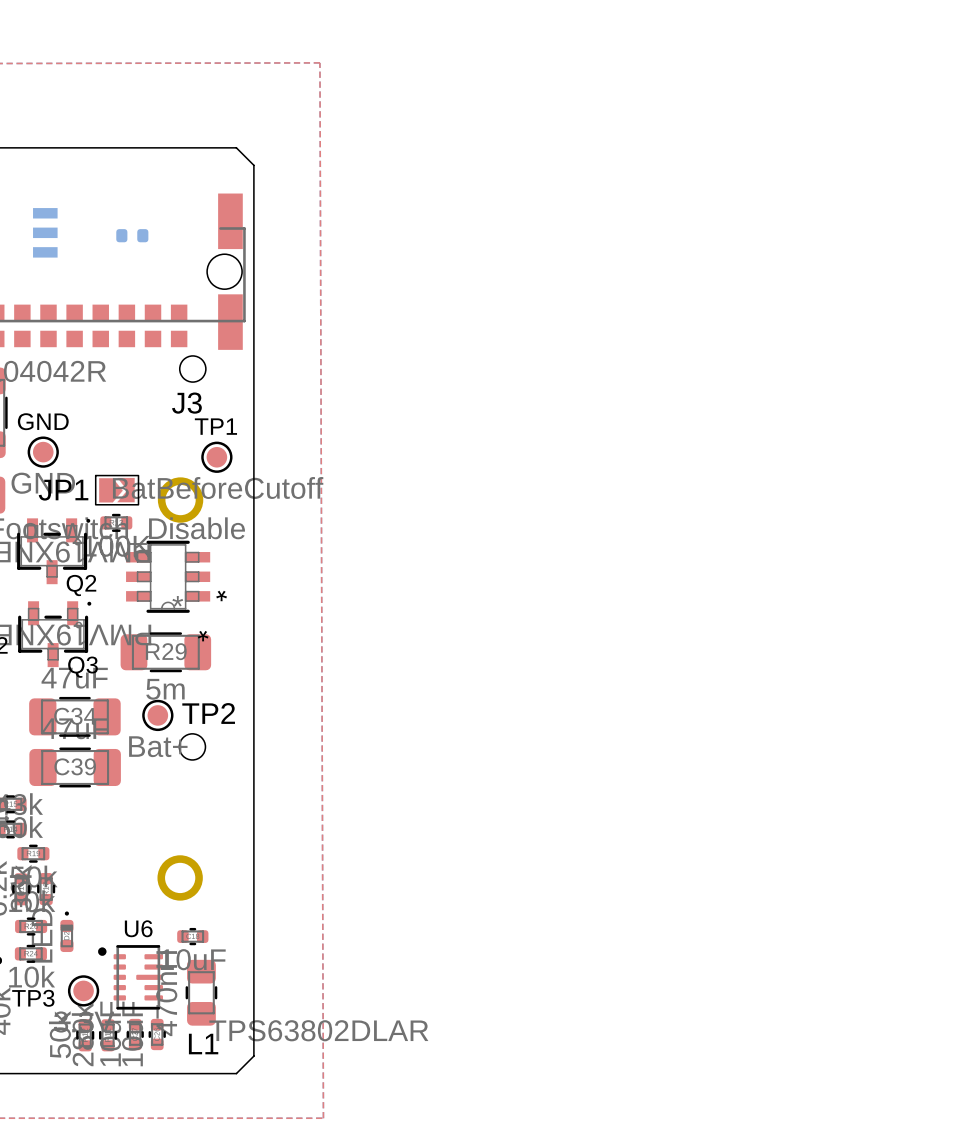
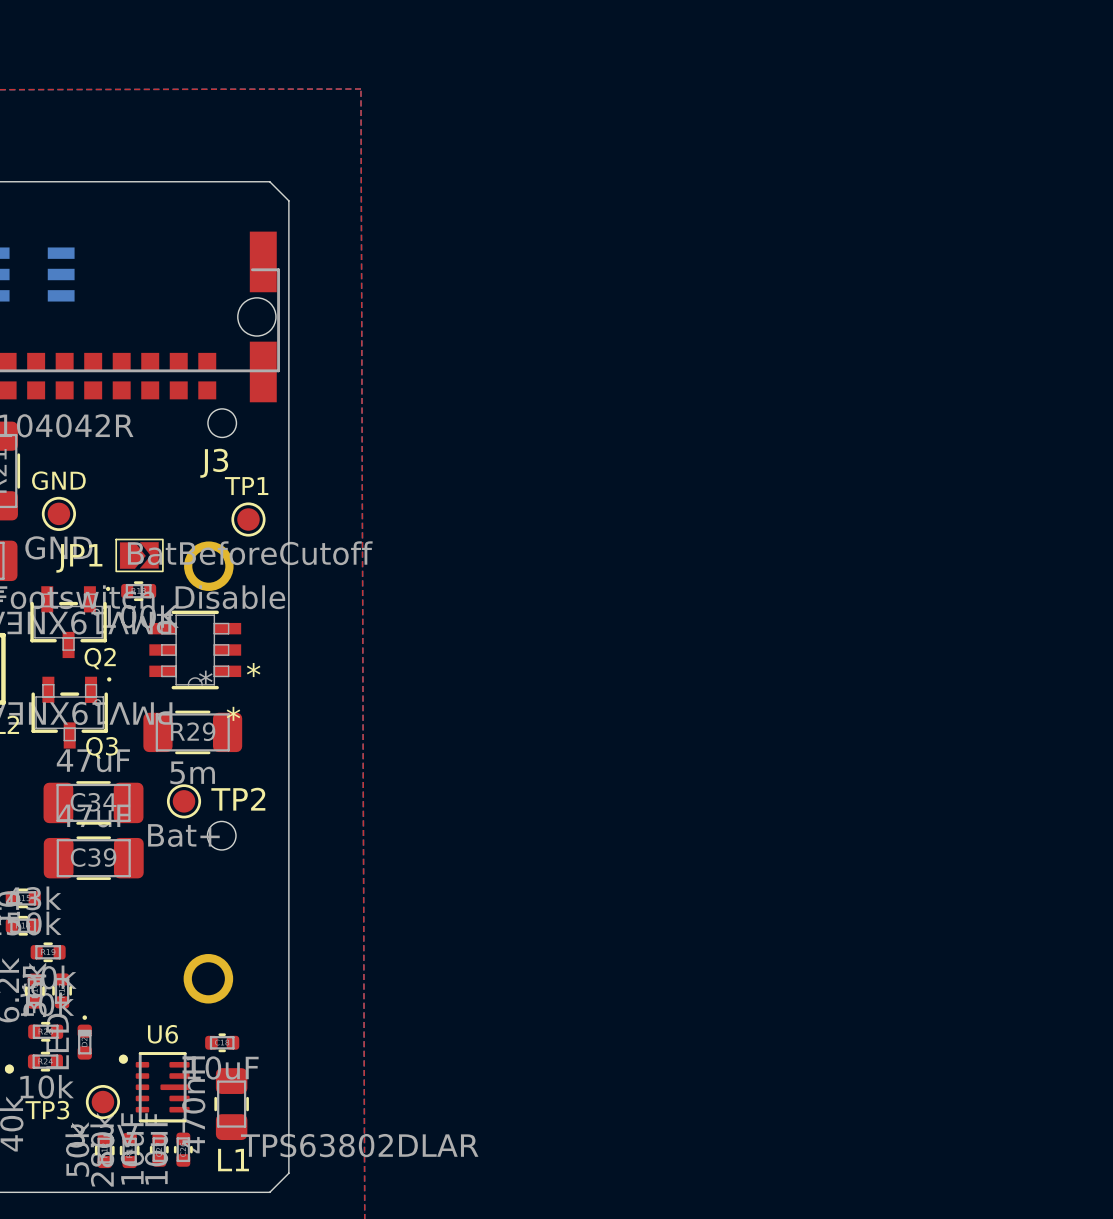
part: (132, 235) -> none

